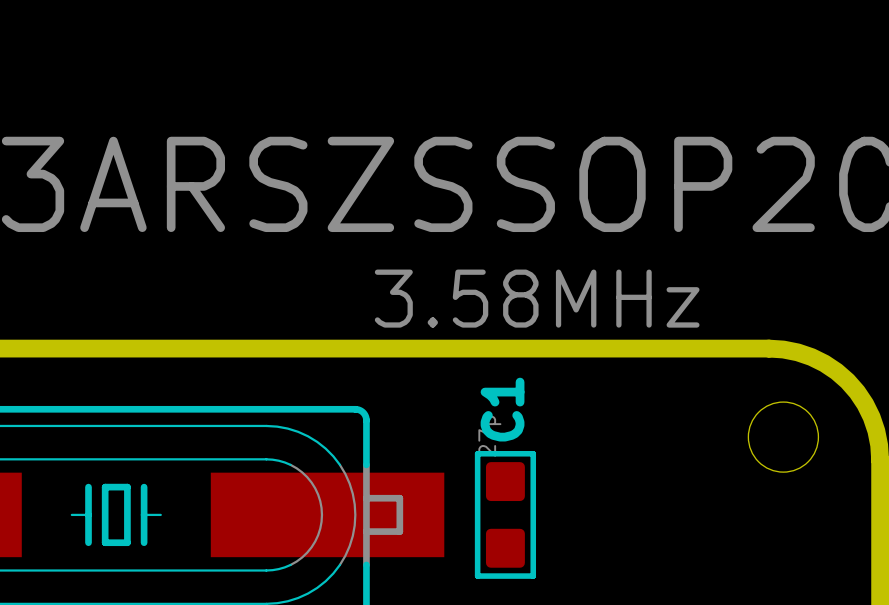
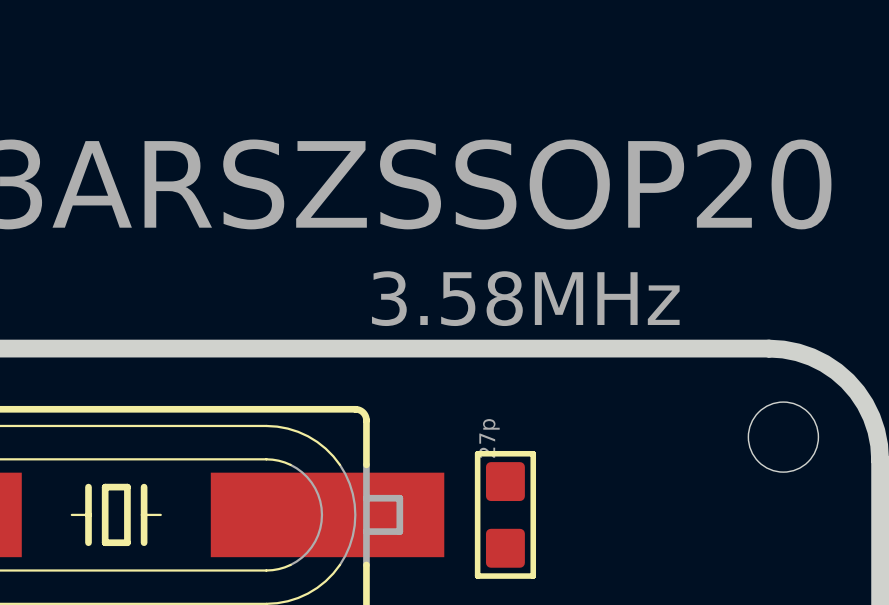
C1 name: C1 (502, 409) -> none

